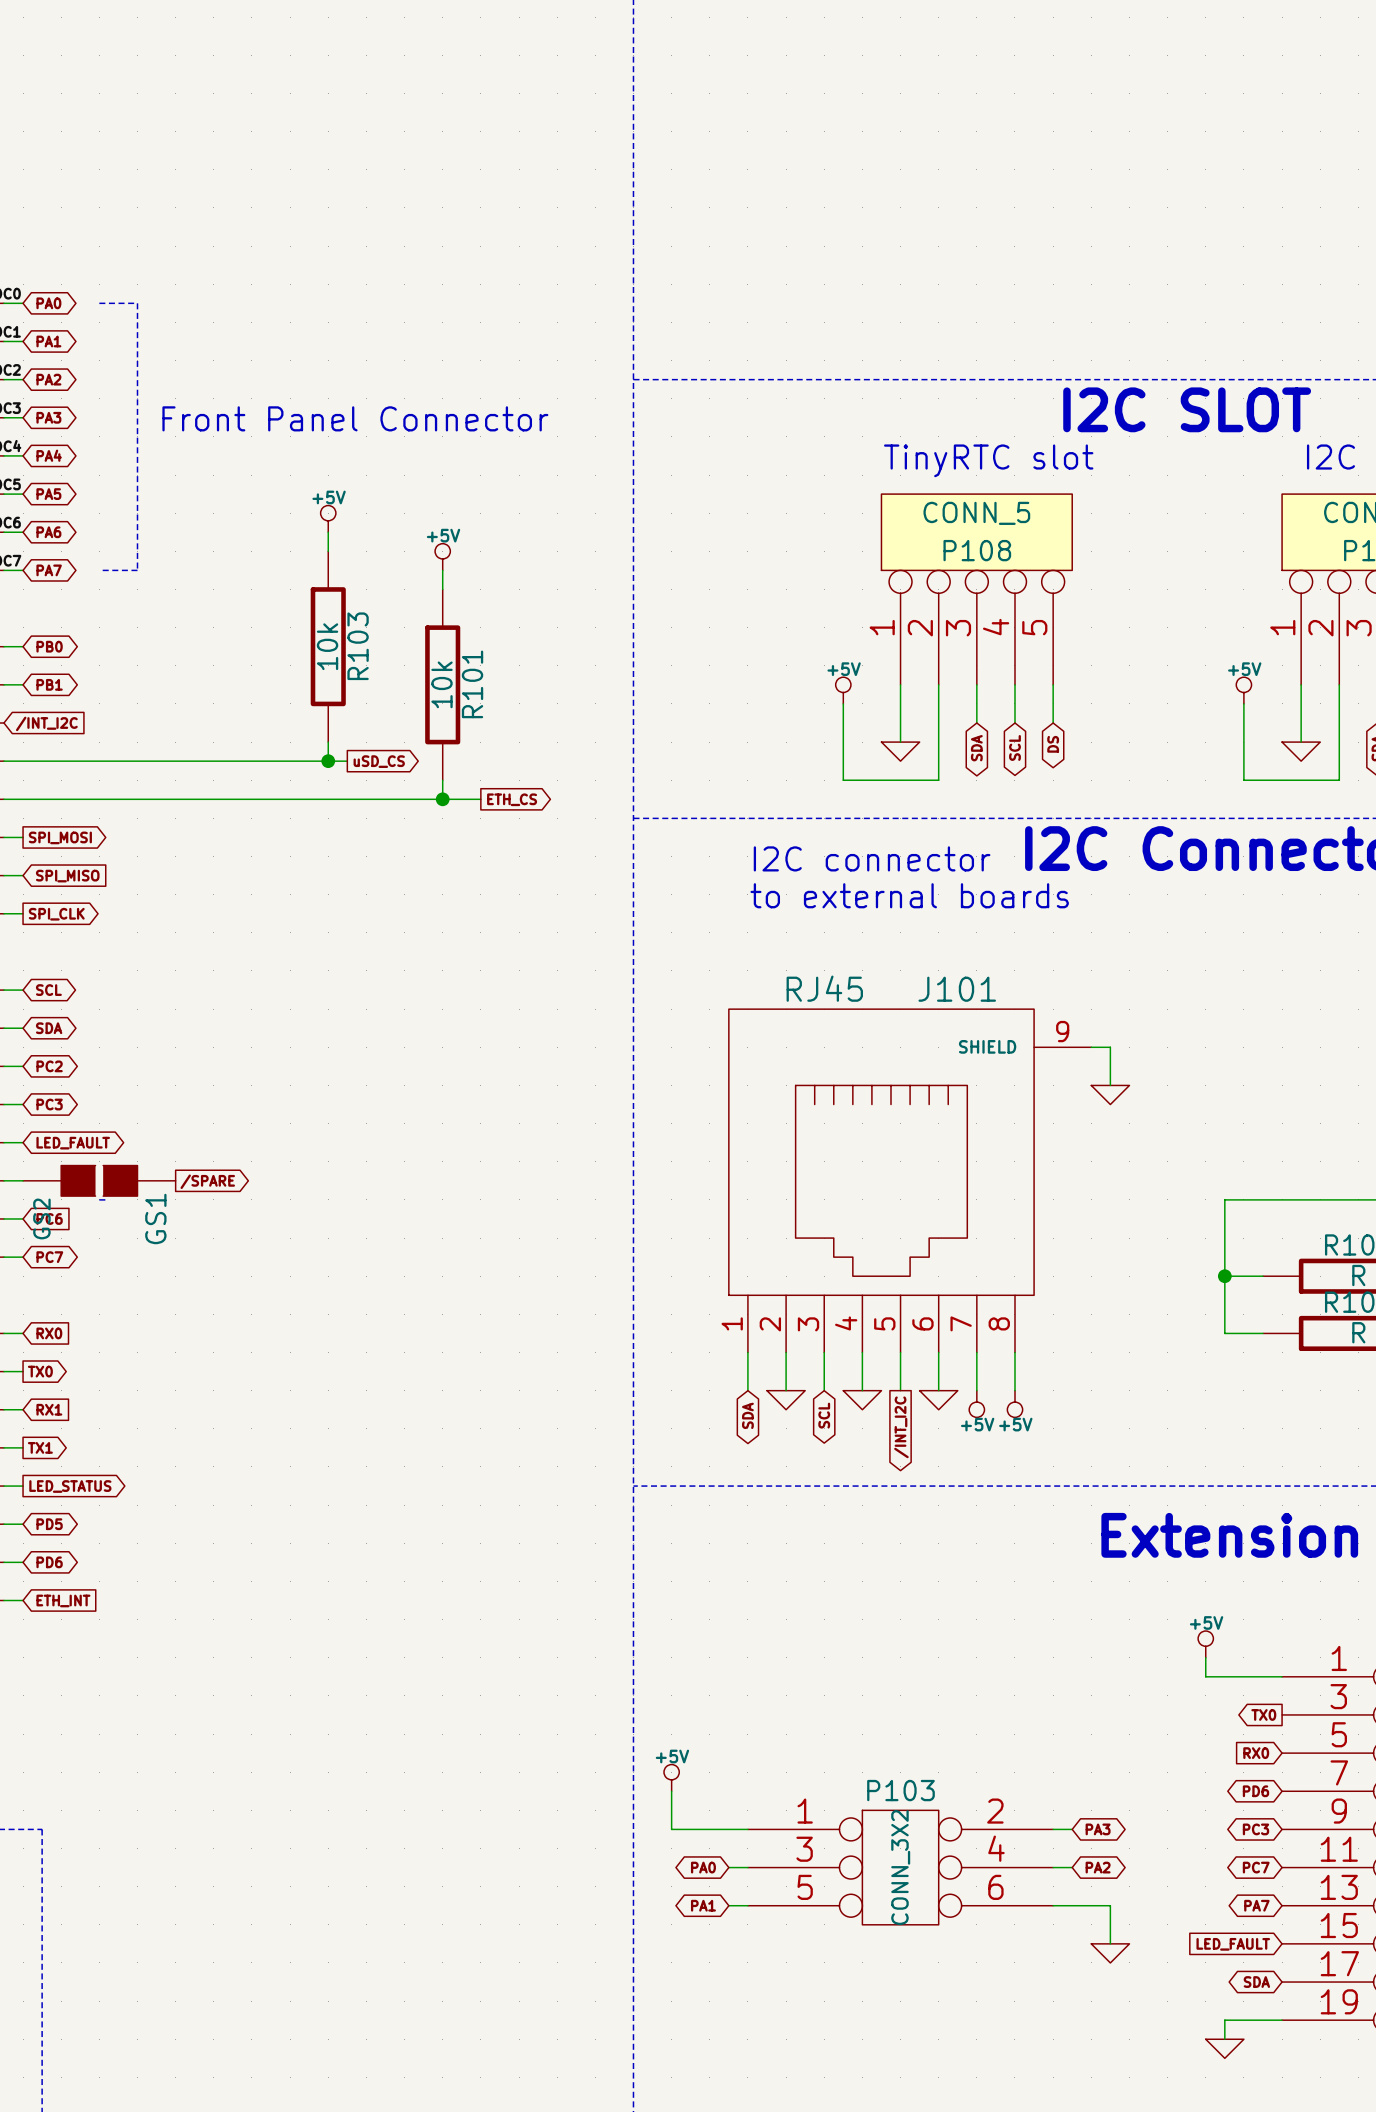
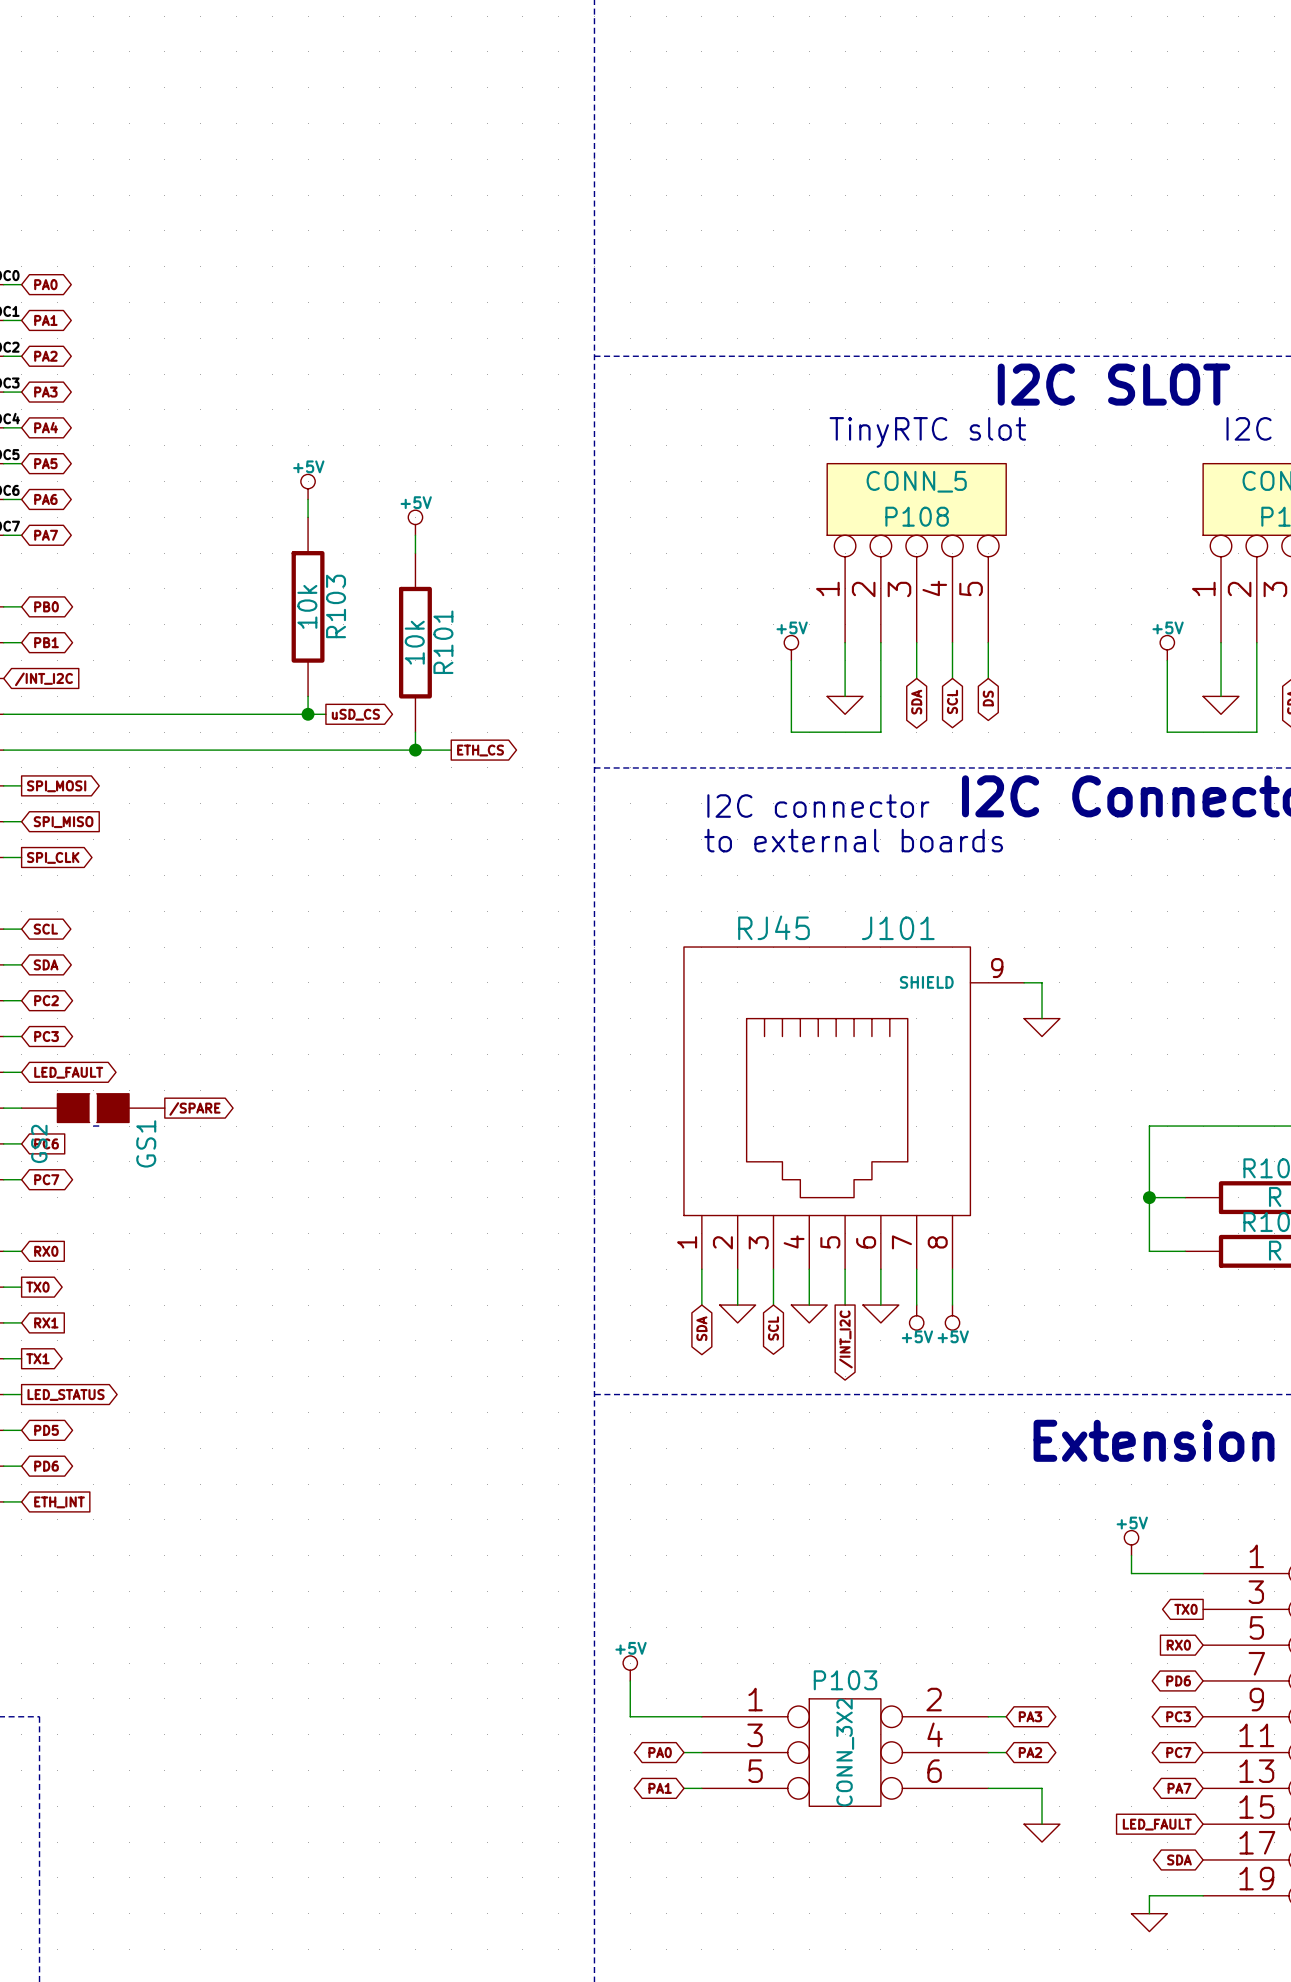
line: (99, 303) (137, 303) (137, 570) (99, 570) -> none
text: Front Panel Connector (355, 418) -> none

